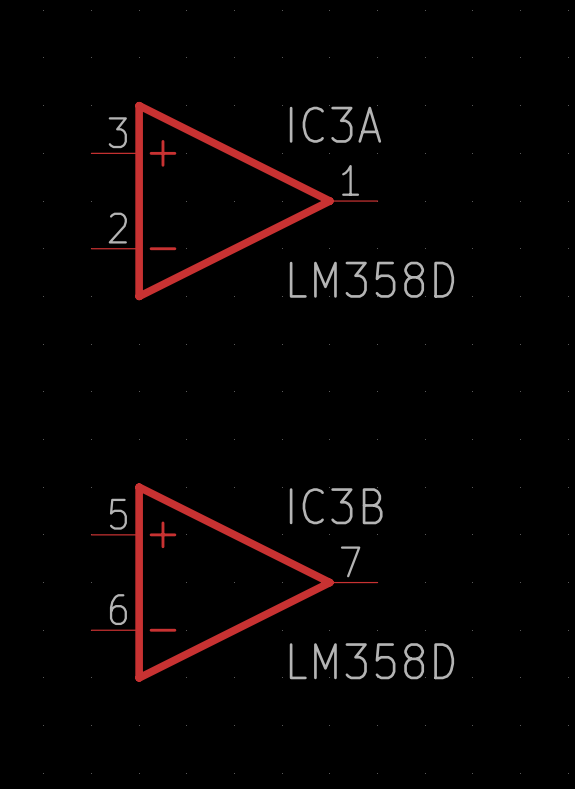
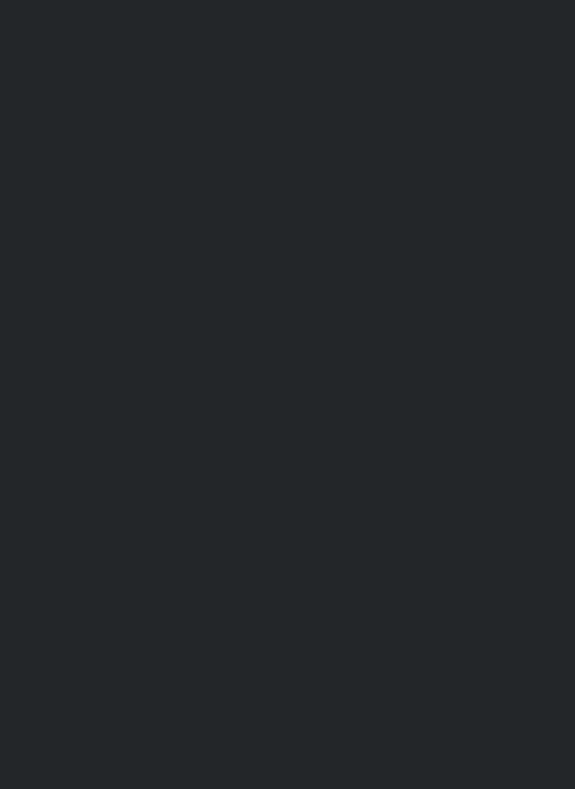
IC3A: LM358D (234, 201) -> none
IC3B: LM358D (234, 582) -> none

